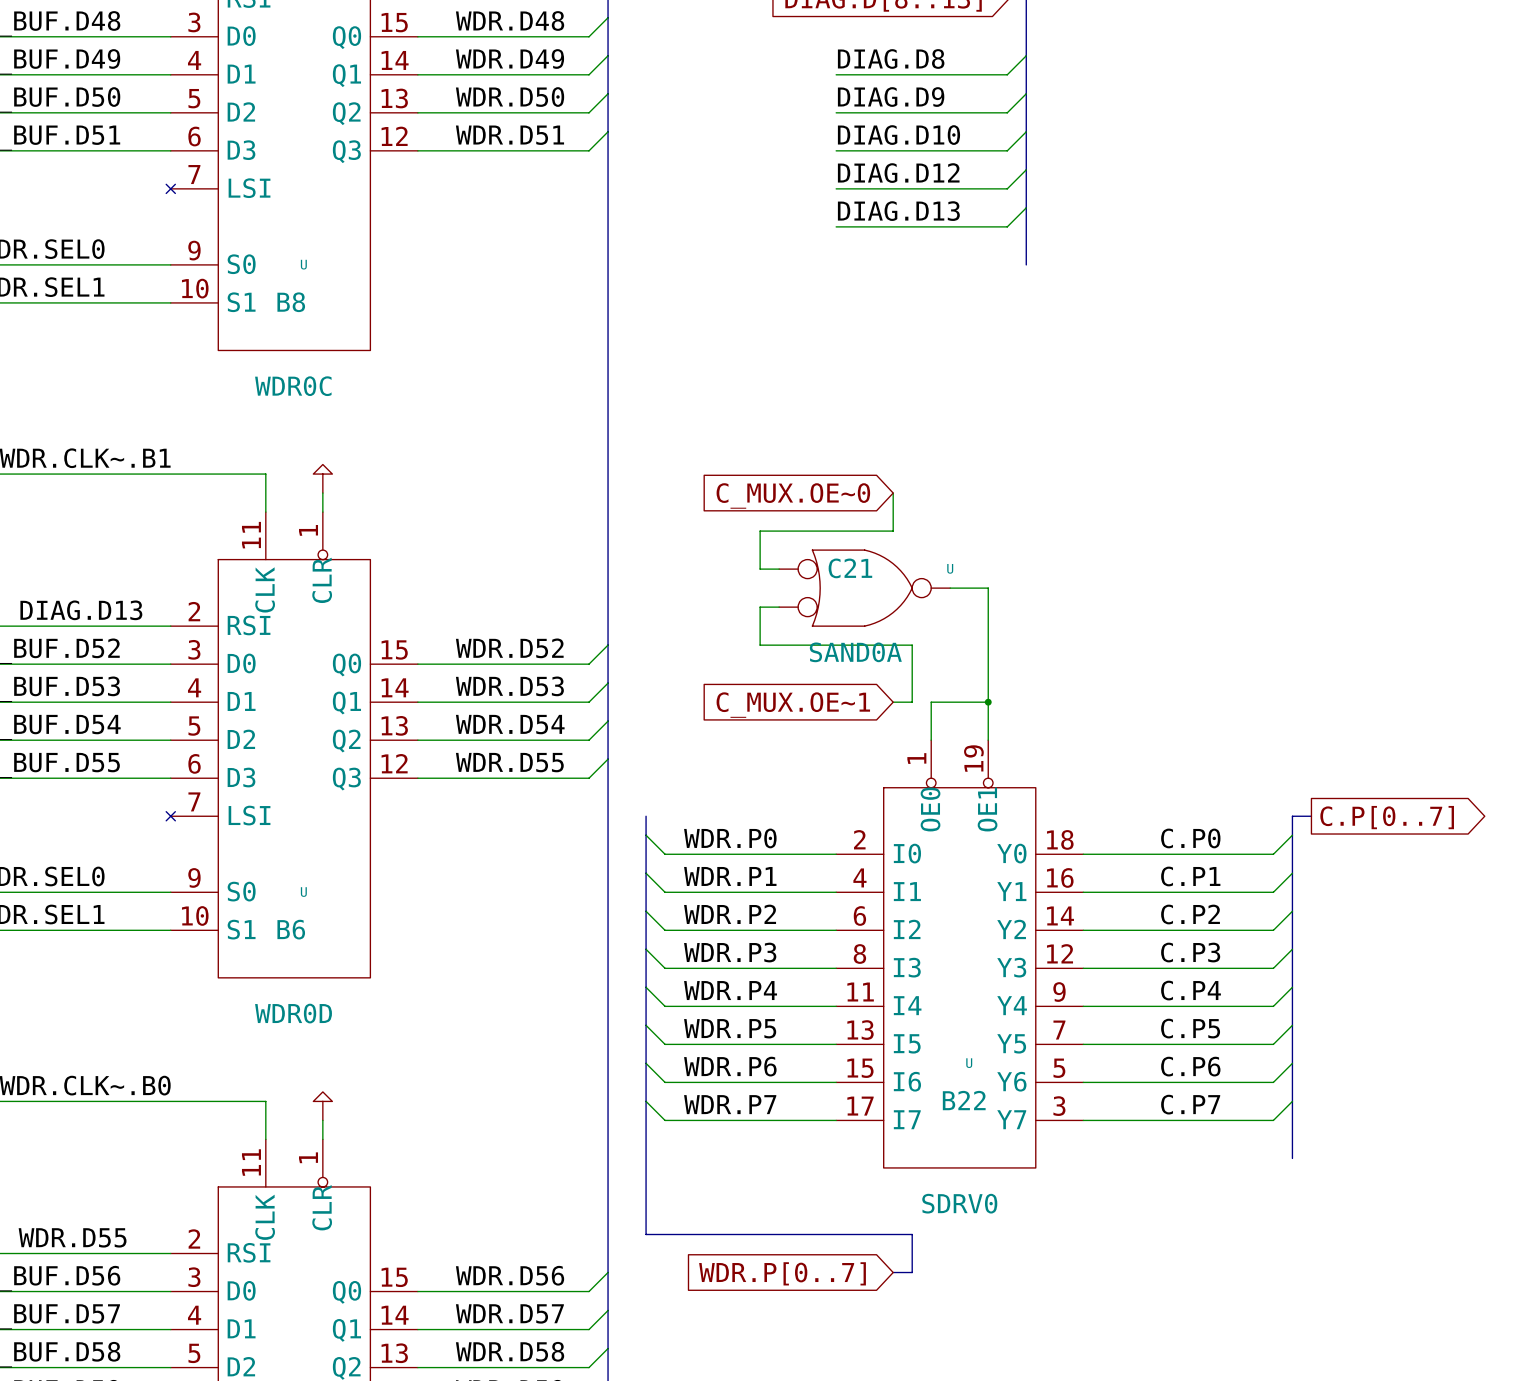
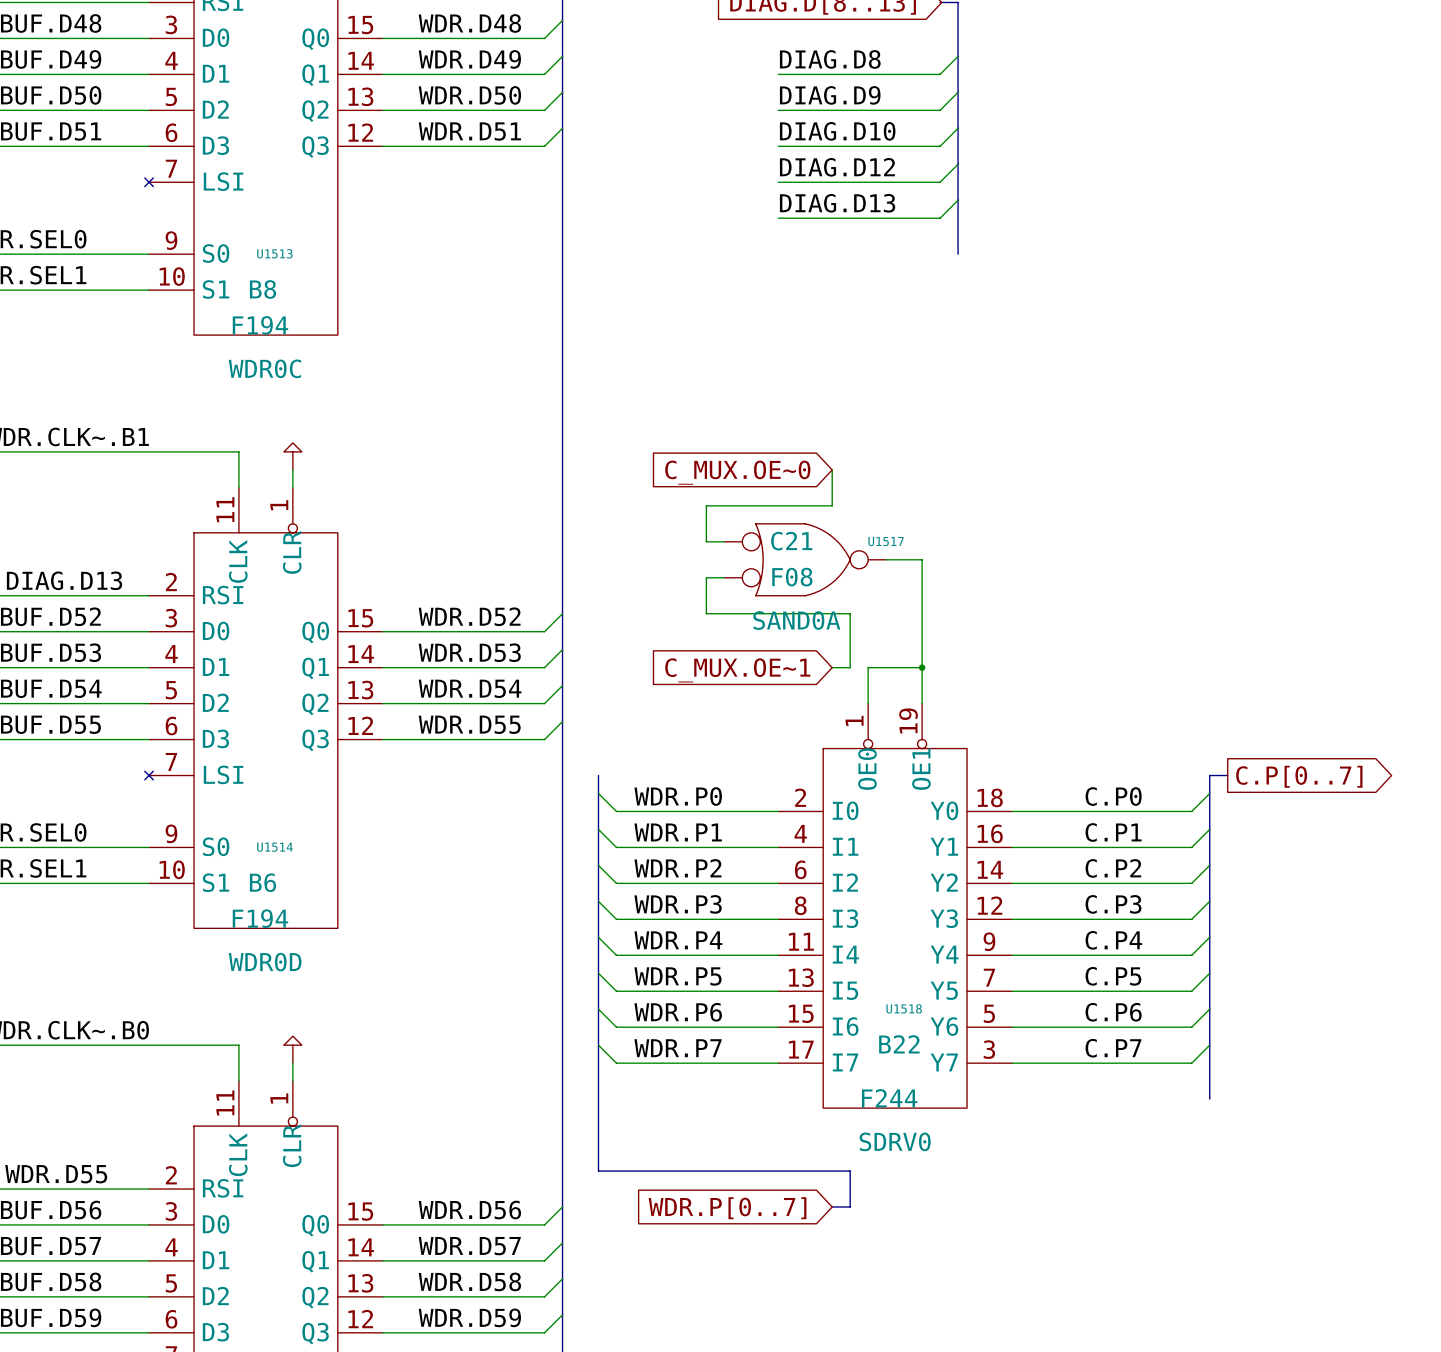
U name: U (303, 264) -> U1513 (274, 253)
U value: none -> F194 (260, 325)
U name: U (950, 568) -> U1517 (886, 541)
U value: none -> F08 (792, 577)
U name: U (303, 892) -> U1514 (275, 847)
U value: none -> F194 (260, 918)
U name: U (969, 1063) -> U1518 (904, 1008)
U value: none -> F244 (889, 1098)

